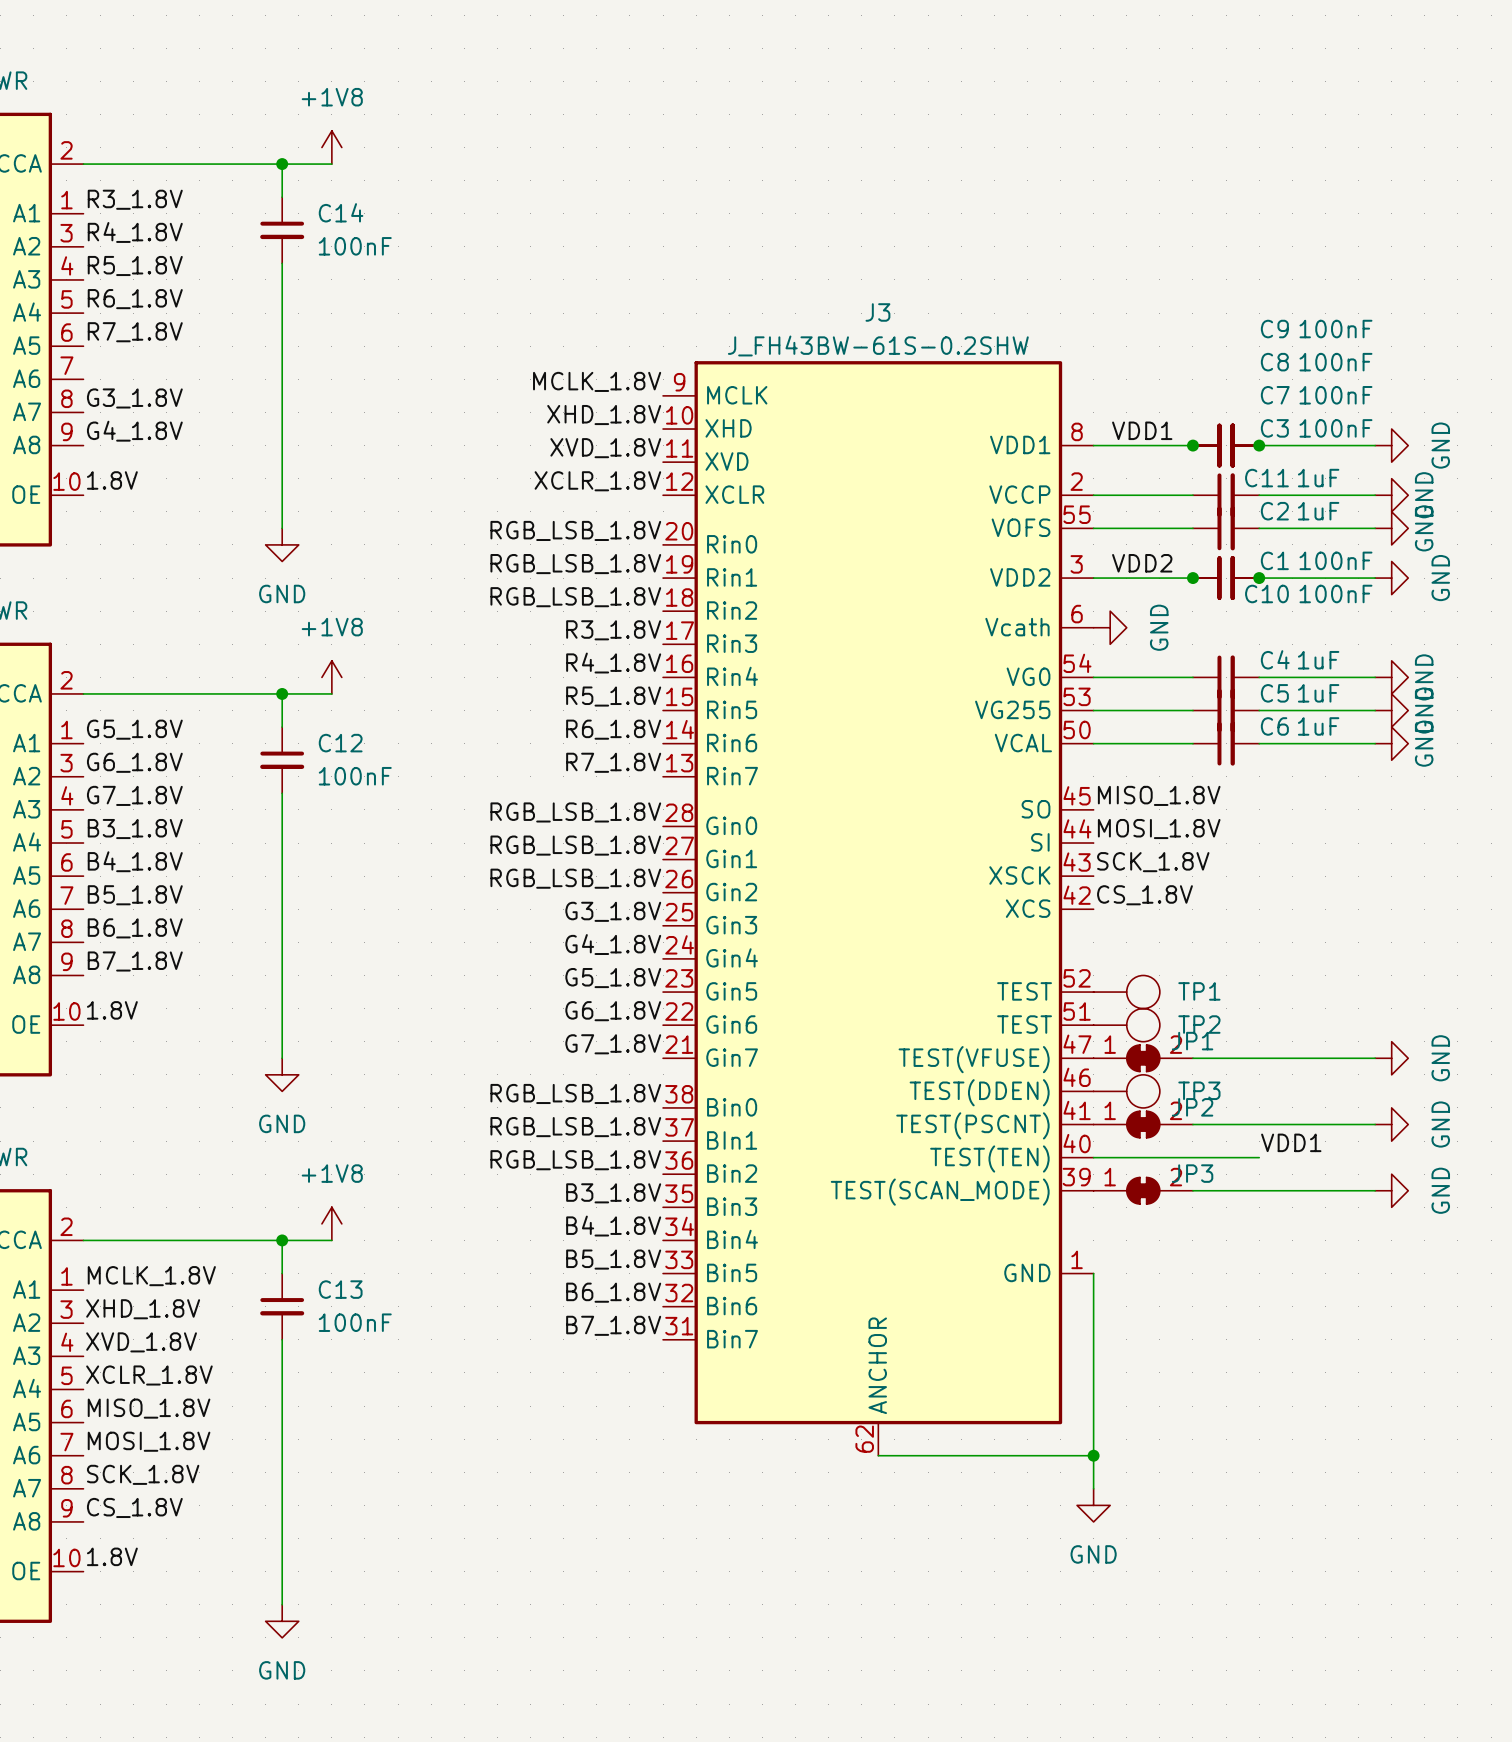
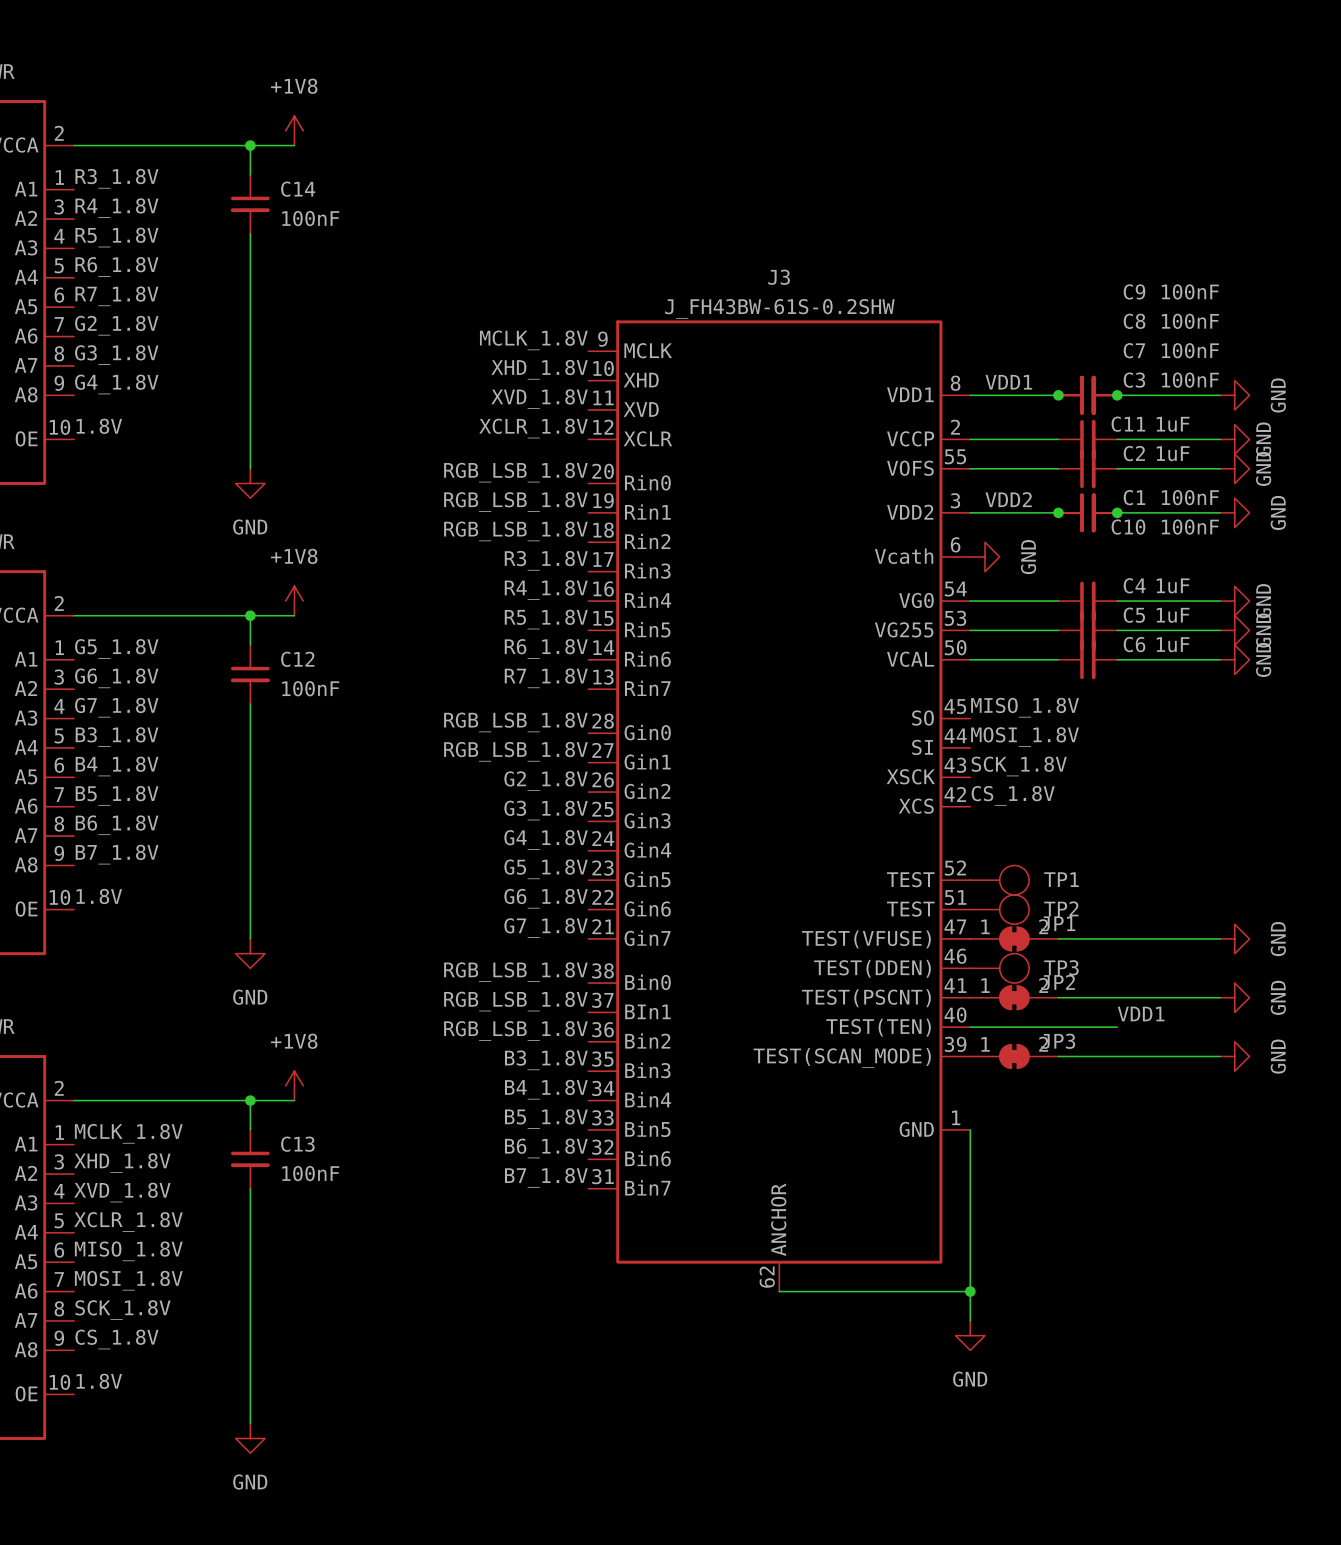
label: none -> G2_1.8V (116, 325)
label: RGB_LSB_1.8V (575, 878) -> G2_1.8V (546, 781)

